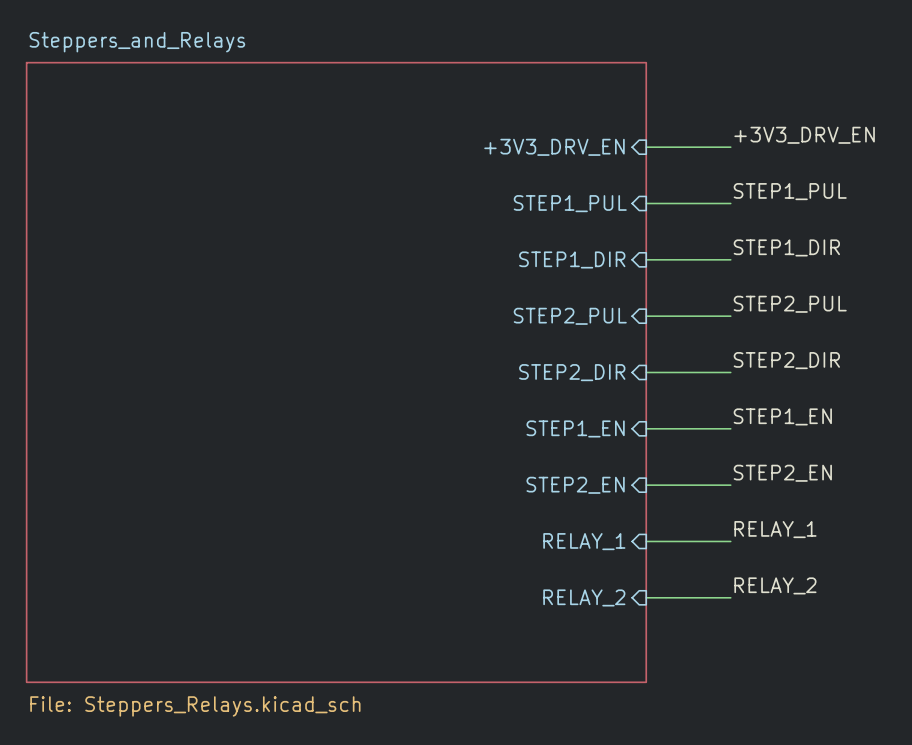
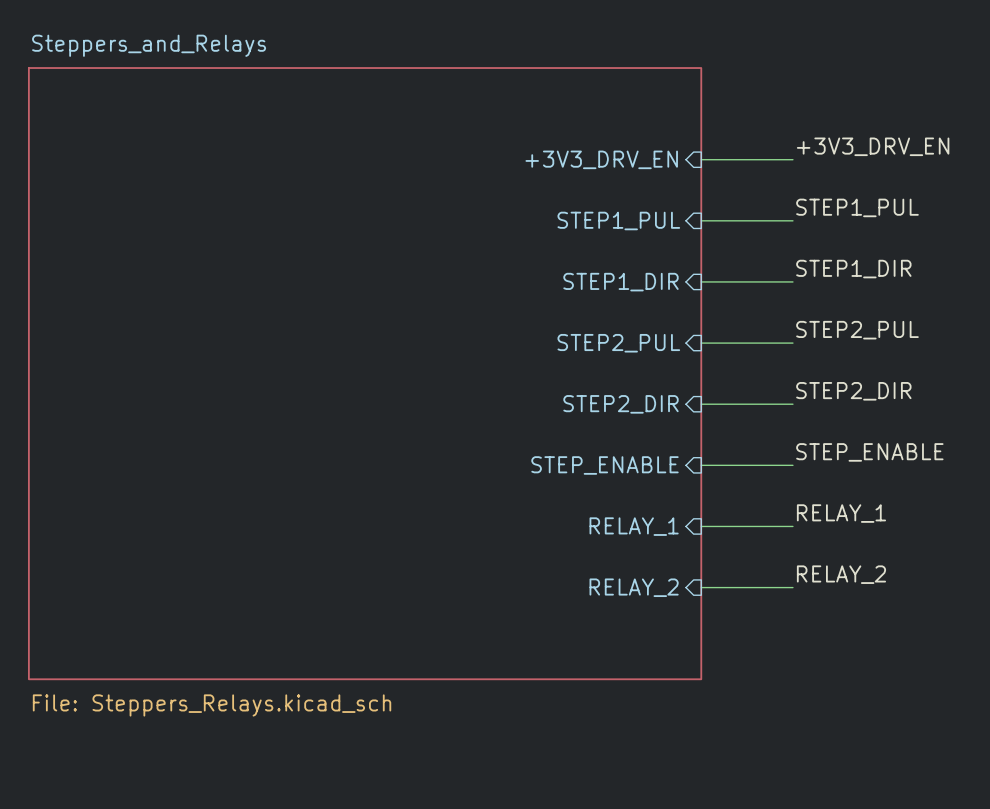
sheet Steppers_and_Relays: none -> File: Steppers_Relays.kicad_sch (365, 373)
sheet Steppers_and_Relays: File: Steppers_Relays.kicad_sch (336, 372) -> none
label: STEP1_EN (782, 416) -> STEP_ENABLE (869, 452)
sheet pin: STEP1_EN (575, 428) -> STEP_ENABLE (604, 465)
label: STEP2_EN (782, 473) -> RELAY_1 (841, 513)
sheet pin: STEP2_EN (575, 485) -> RELAY_1 (634, 526)
label: RELAY_1 (775, 529) -> RELAY_2 (841, 574)
sheet pin: RELAY_1 (584, 541) -> RELAY_2 (634, 587)
label: RELAY_2 (775, 585) -> none
sheet pin: RELAY_2 (584, 597) -> none
wire: (646, 597) (730, 597) -> none

